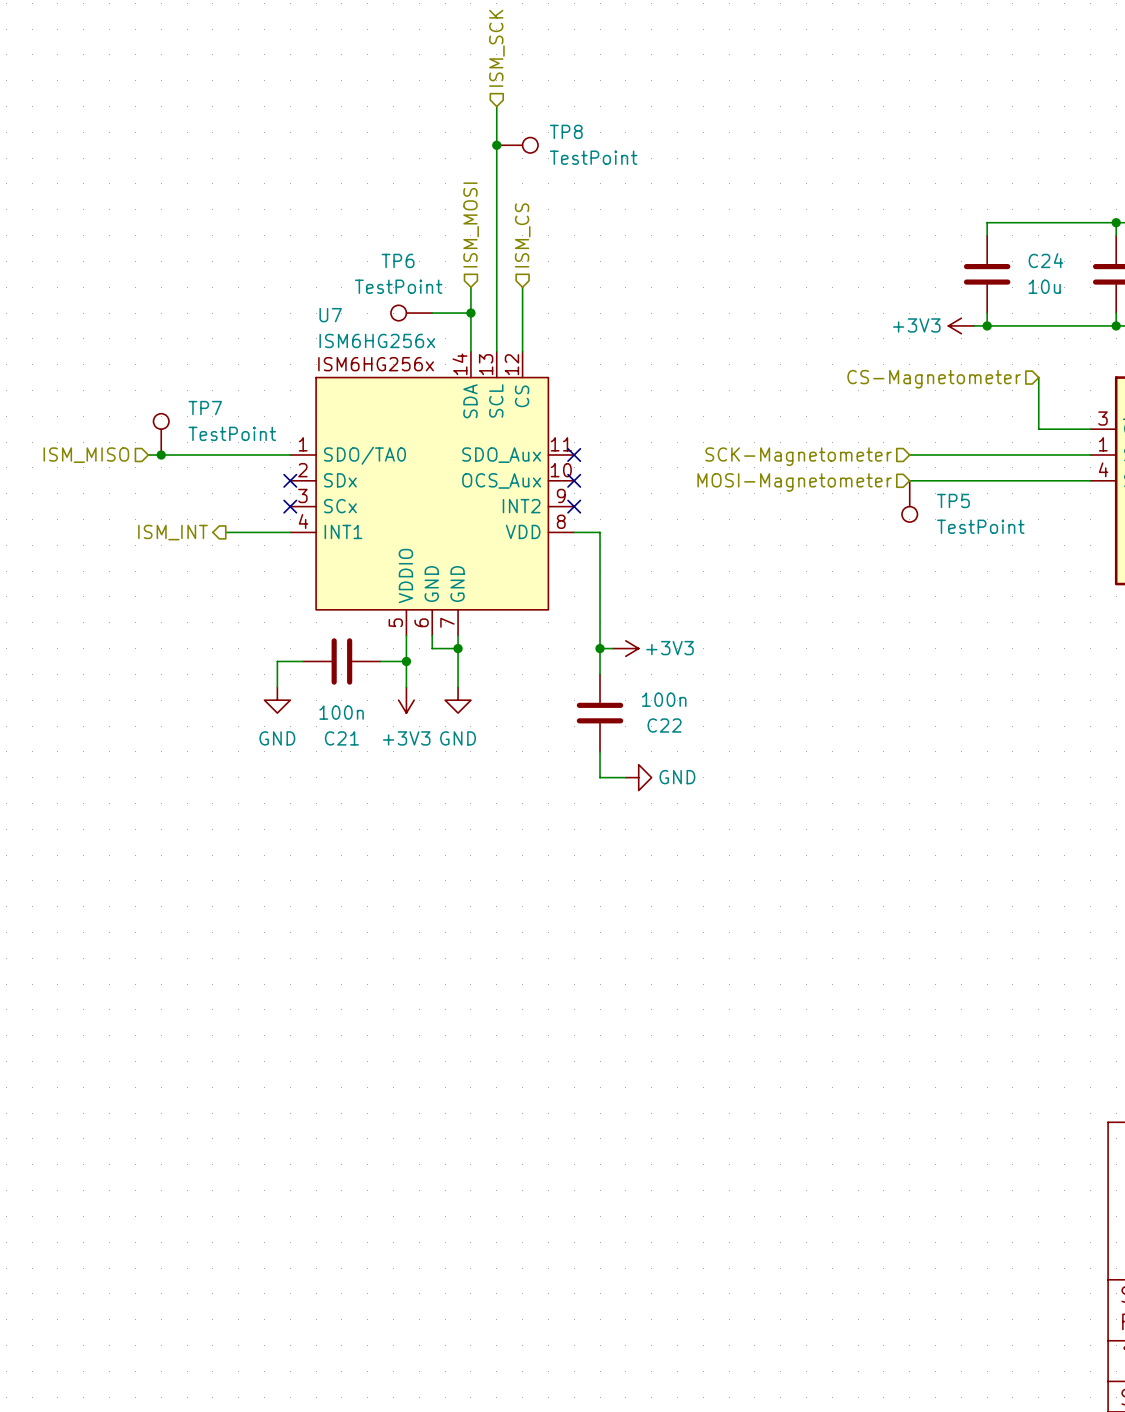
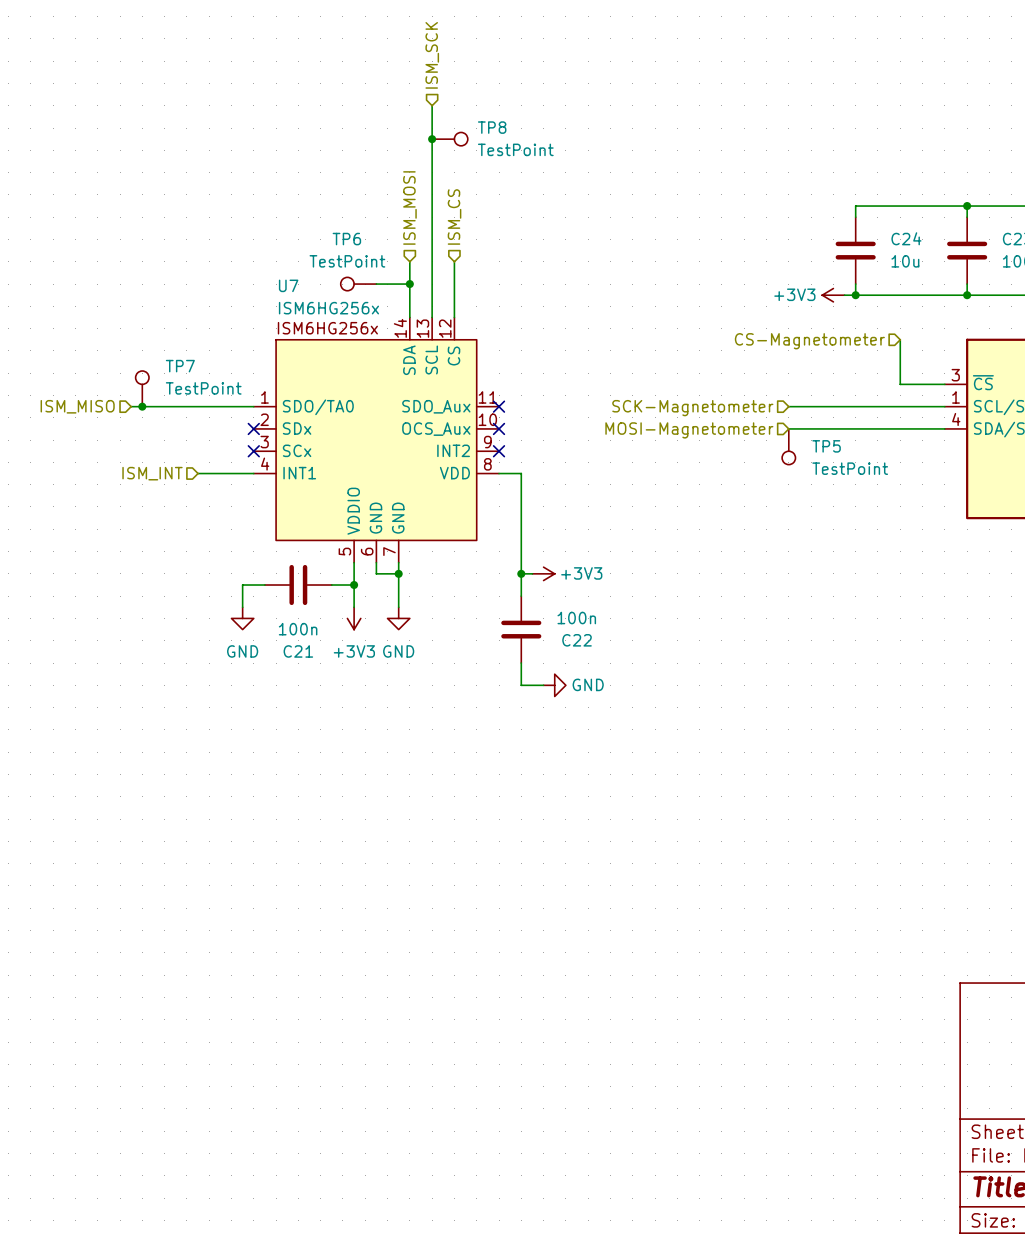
hierarchical label shape: output (173, 532) -> input (152, 473)

